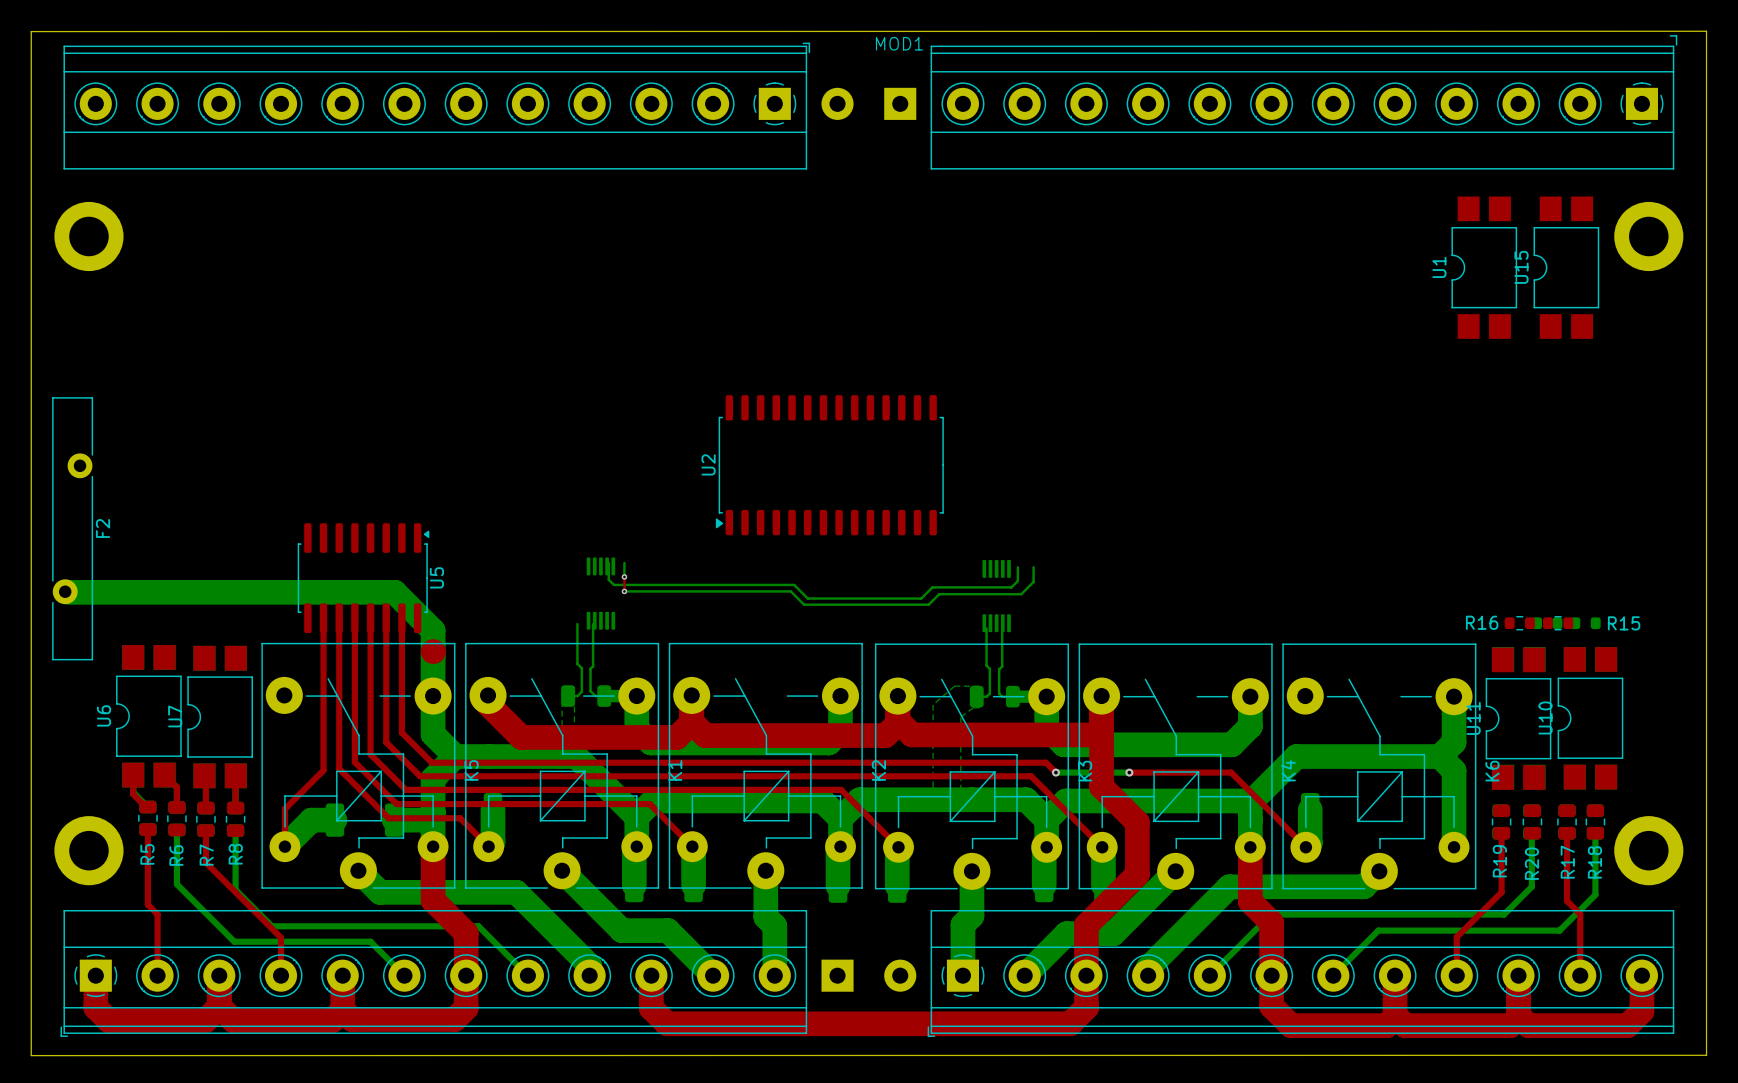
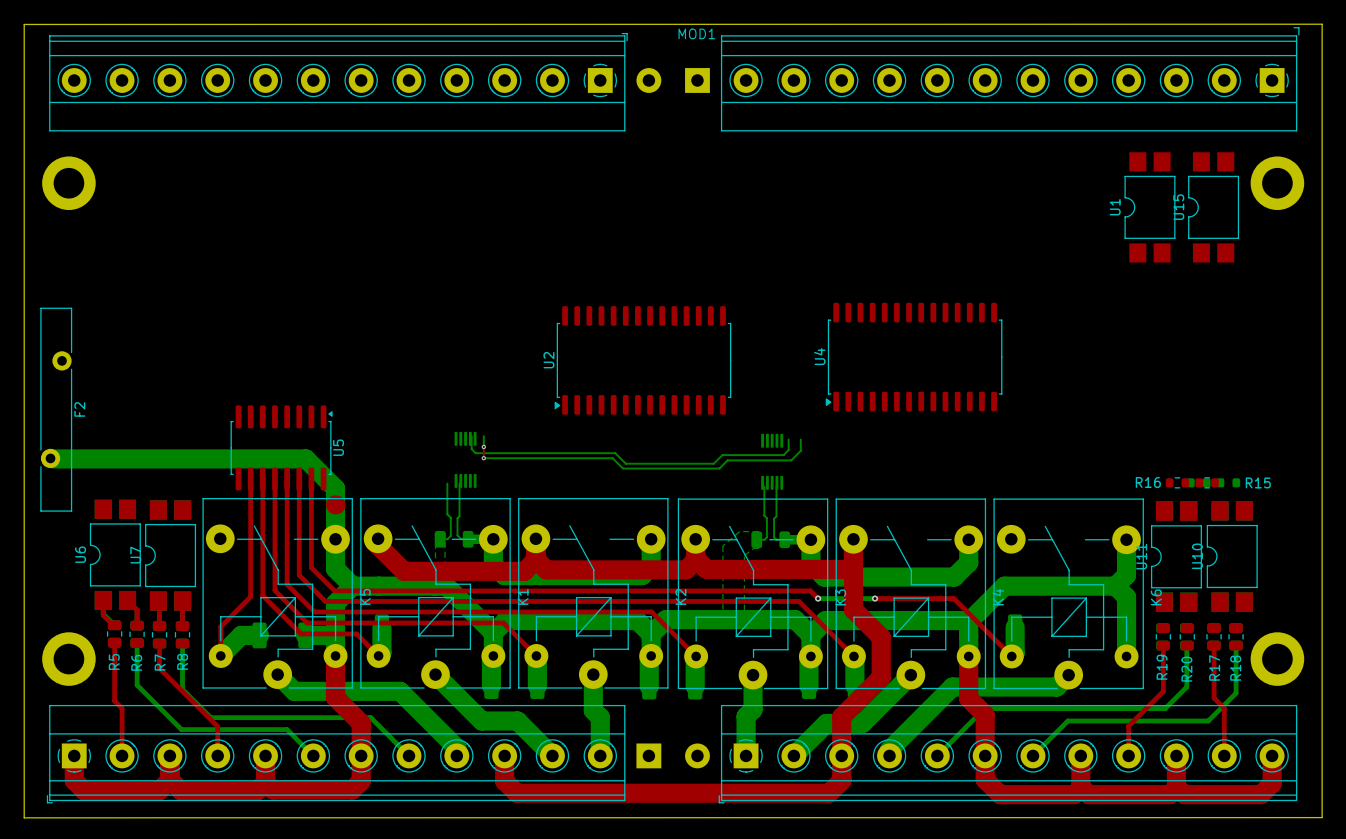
U4: none -> (914, 357)

